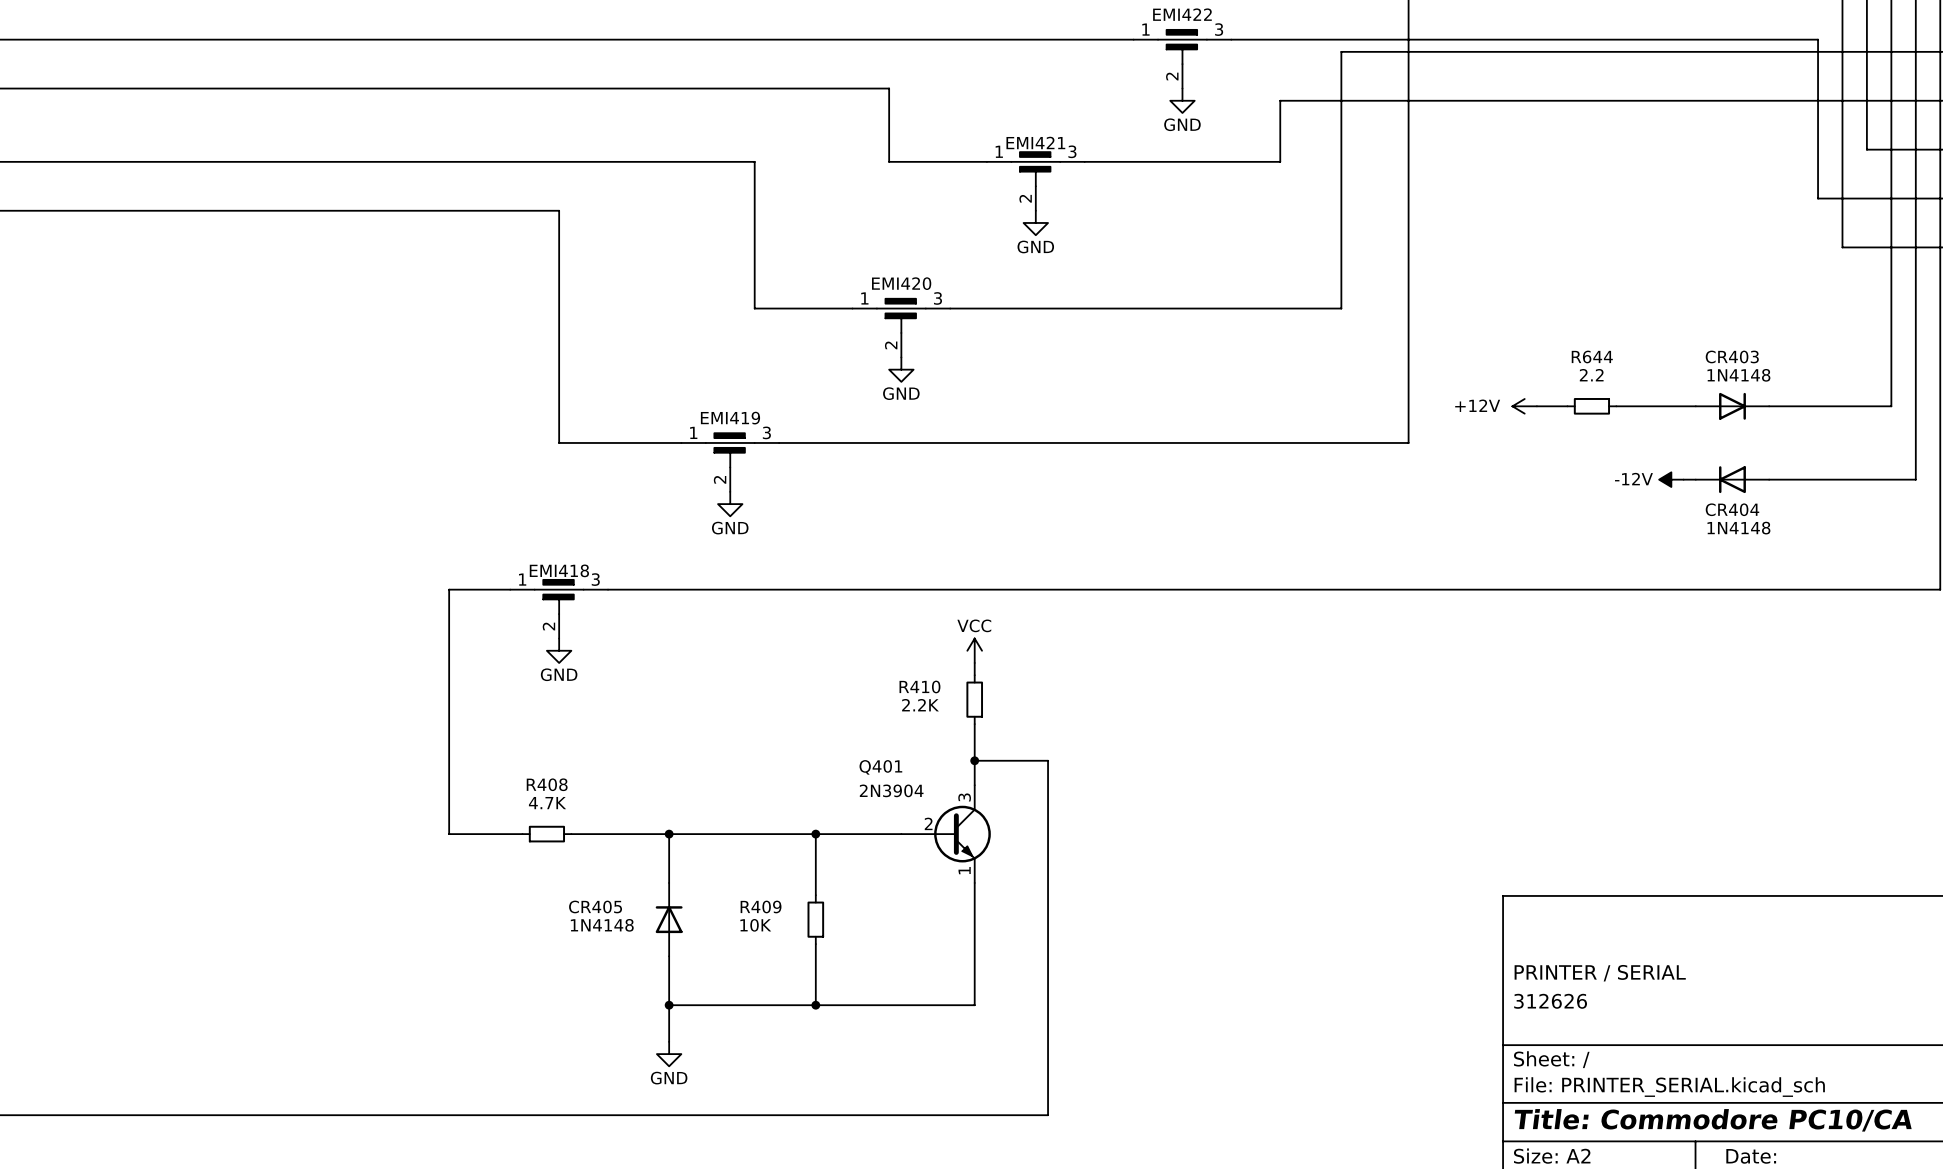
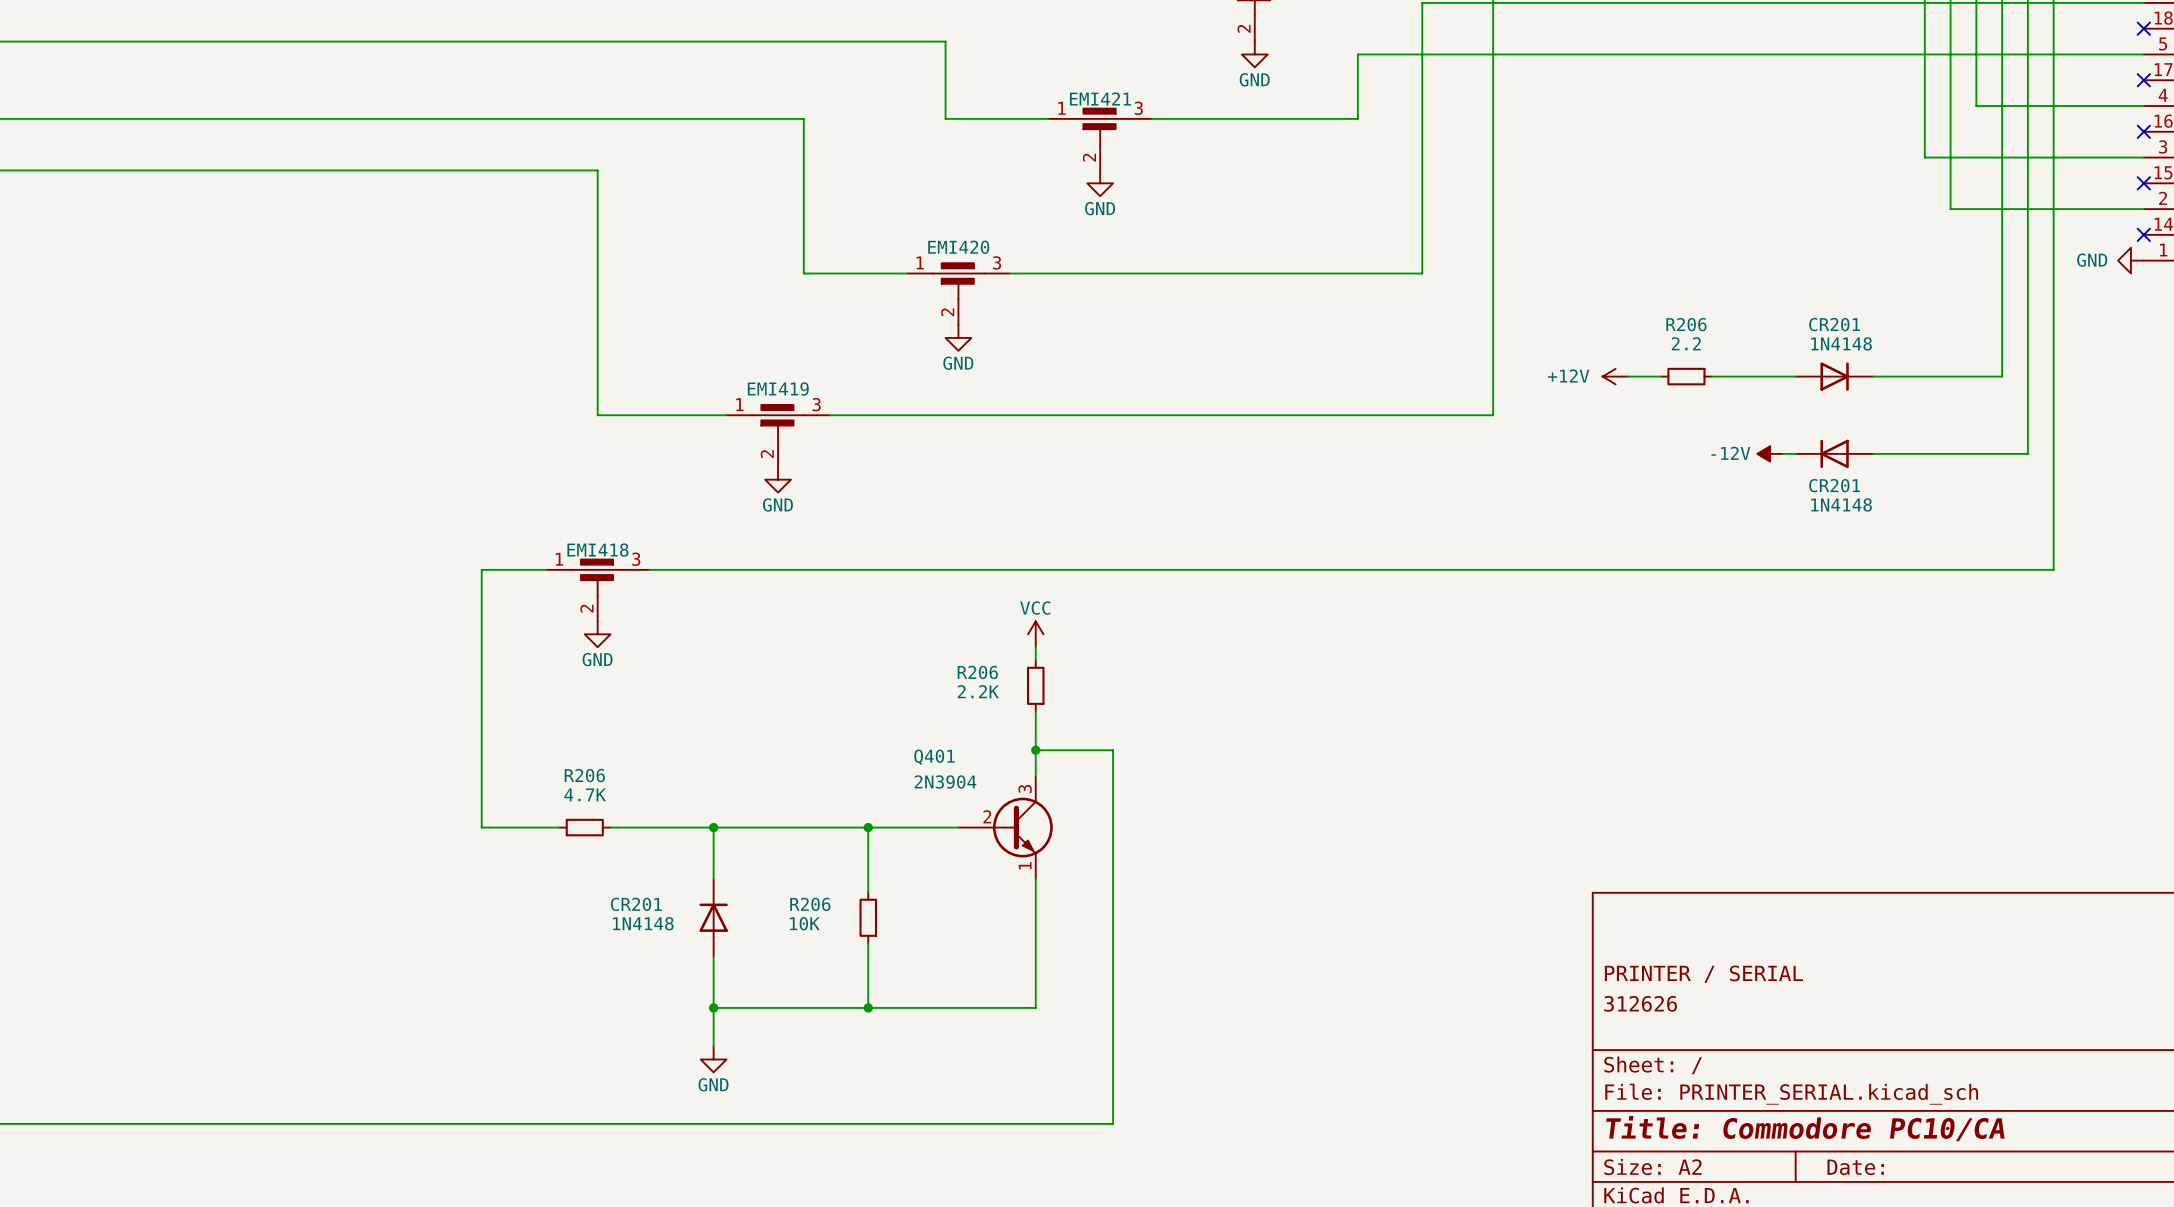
R644 name: R644 (1592, 356) -> R206 (1686, 324)
CR403 name: CR403 (1732, 356) -> CR201 (1834, 324)
CR404 name: CR404 (1732, 509) -> CR201 (1834, 485)
R410 name: R410 (919, 686) -> R206 (977, 672)
R408 name: R408 (547, 784) -> R206 (584, 775)
CR405 name: CR405 (595, 906) -> CR201 (636, 904)
R409 name: R409 (761, 906) -> R206 (810, 904)

